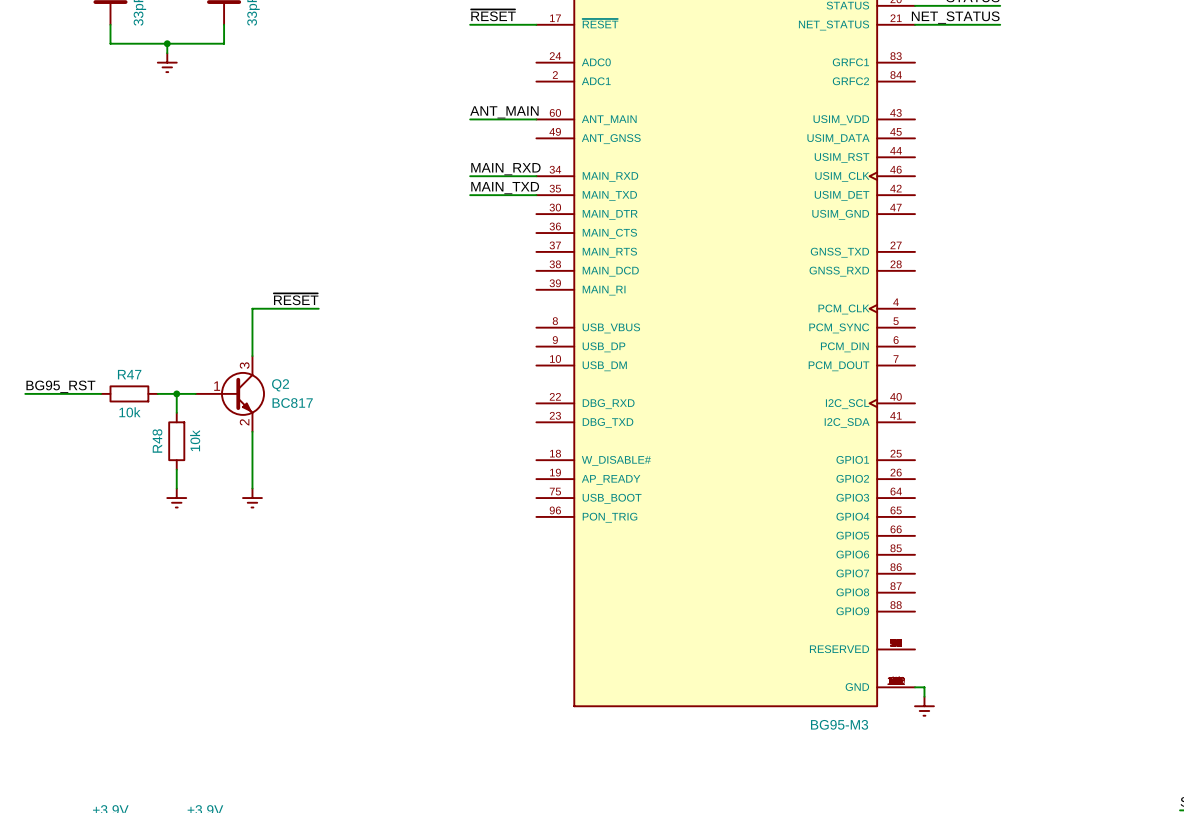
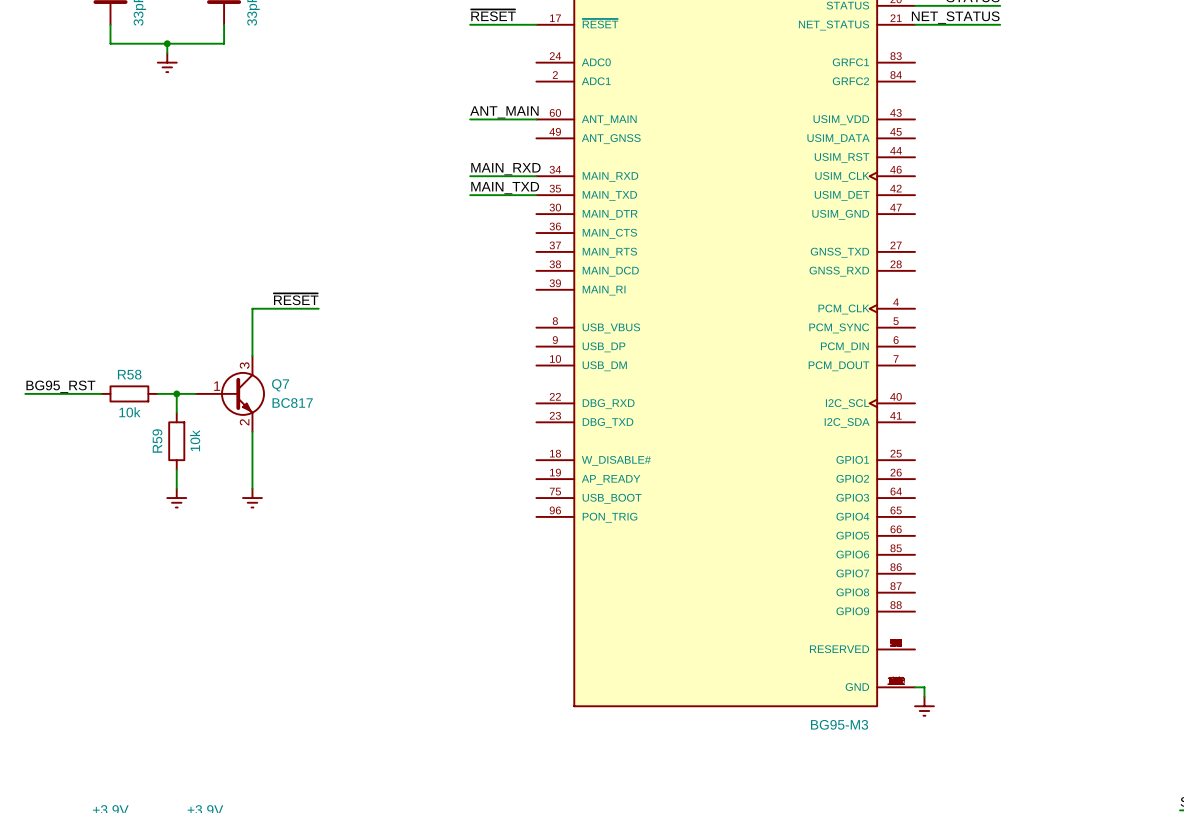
R47 name: R47 (129, 374) -> R58 (129, 374)
Q2 name: Q2 (280, 385) -> Q7 (280, 385)
R48 name: R48 (157, 440) -> R59 (157, 441)

